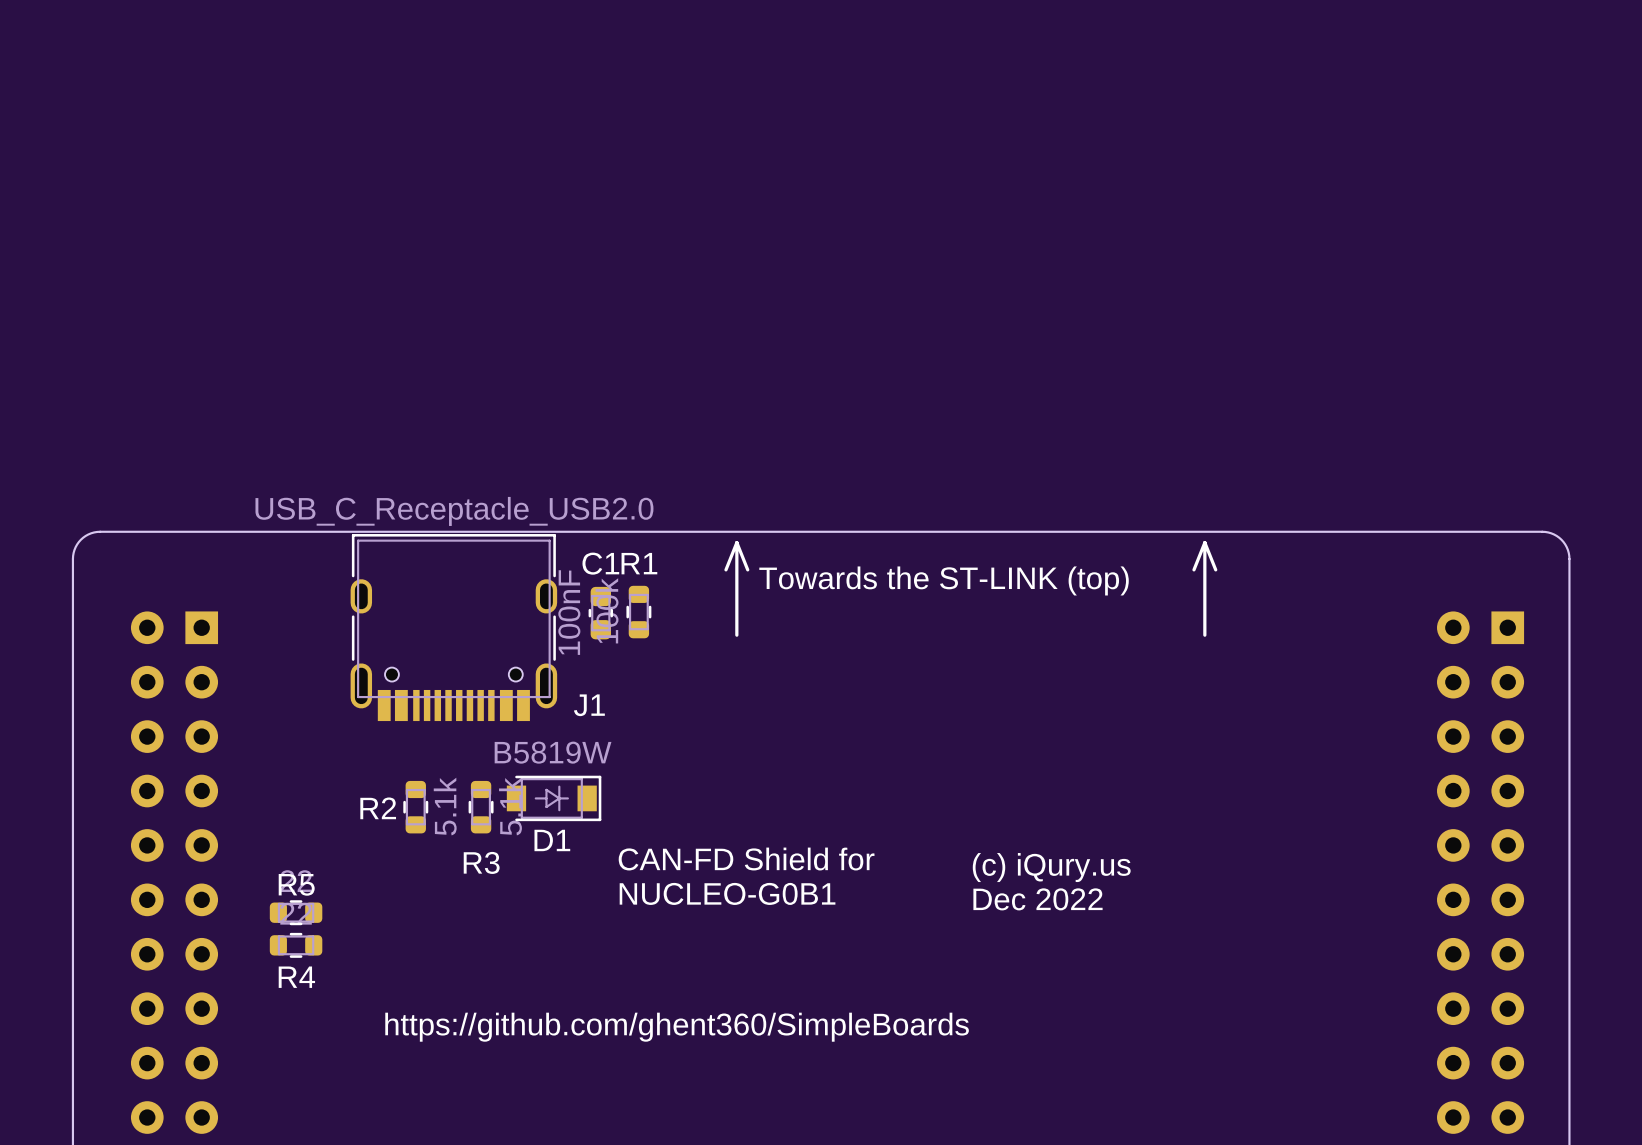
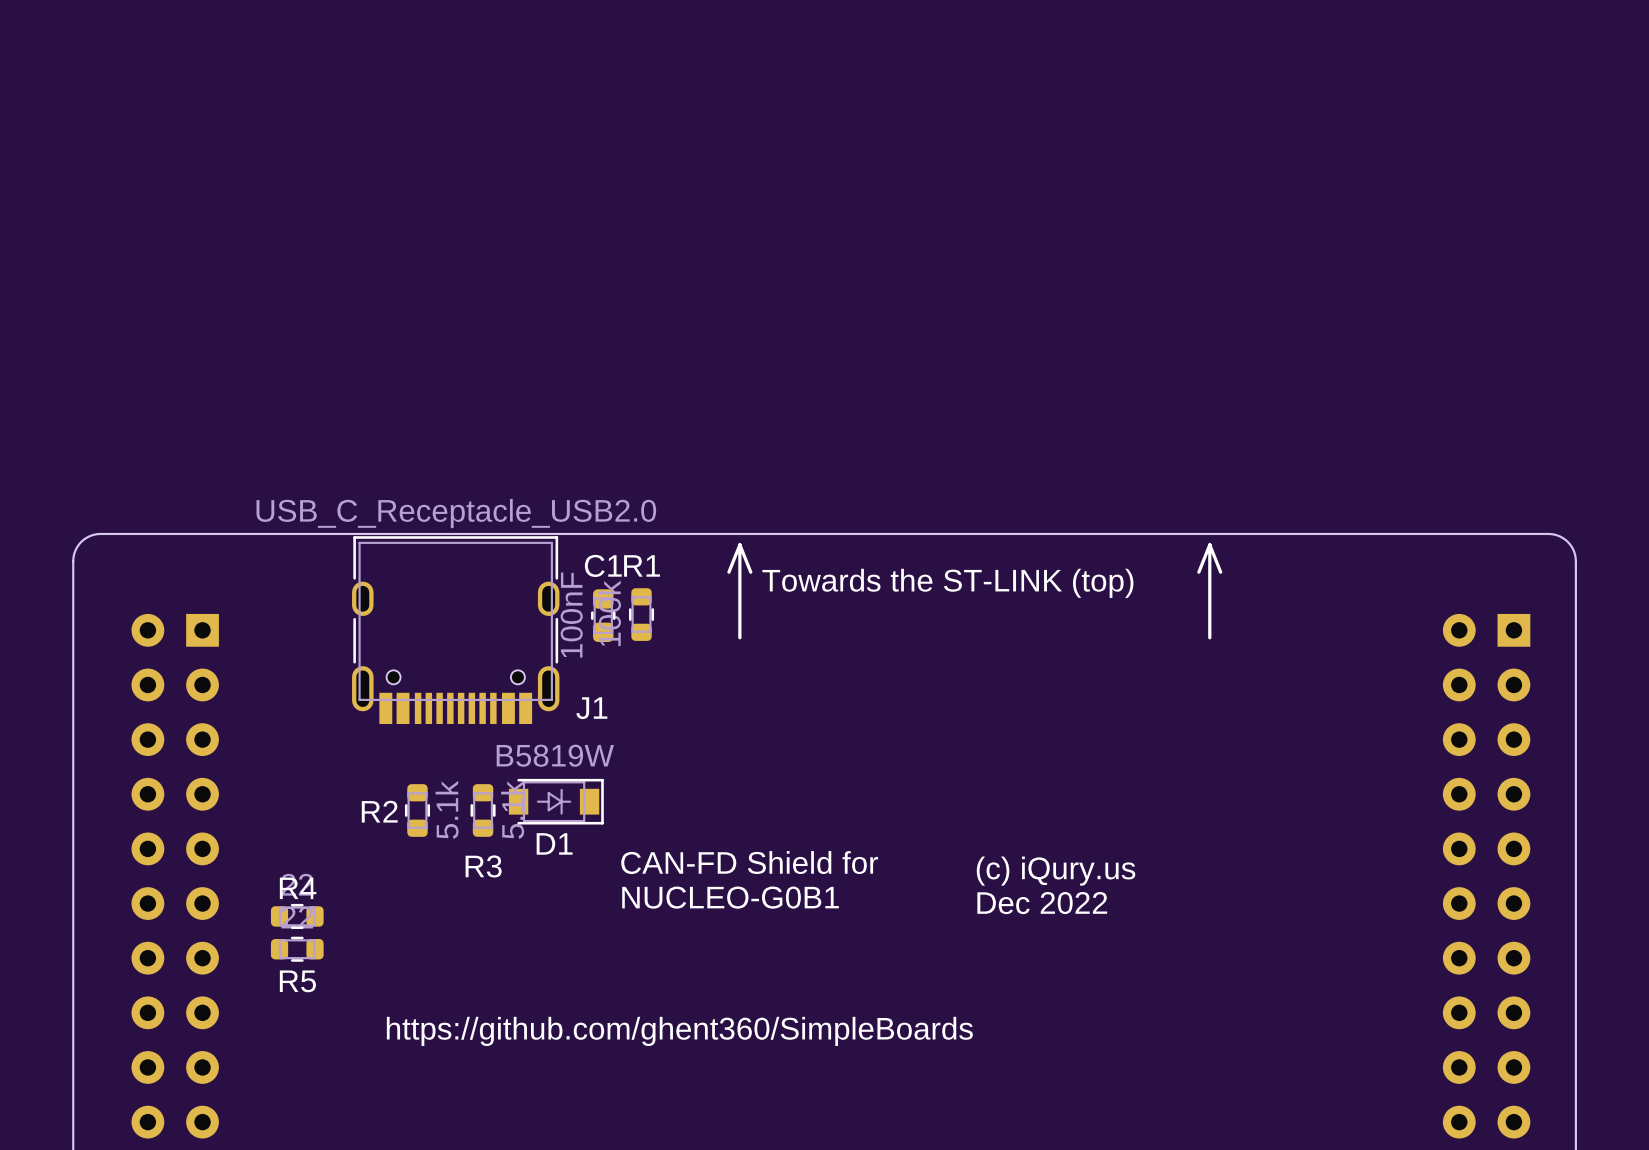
R5 name: R5 (296, 884) -> R4 (298, 888)
R4 name: R4 (296, 977) -> R5 (297, 981)

